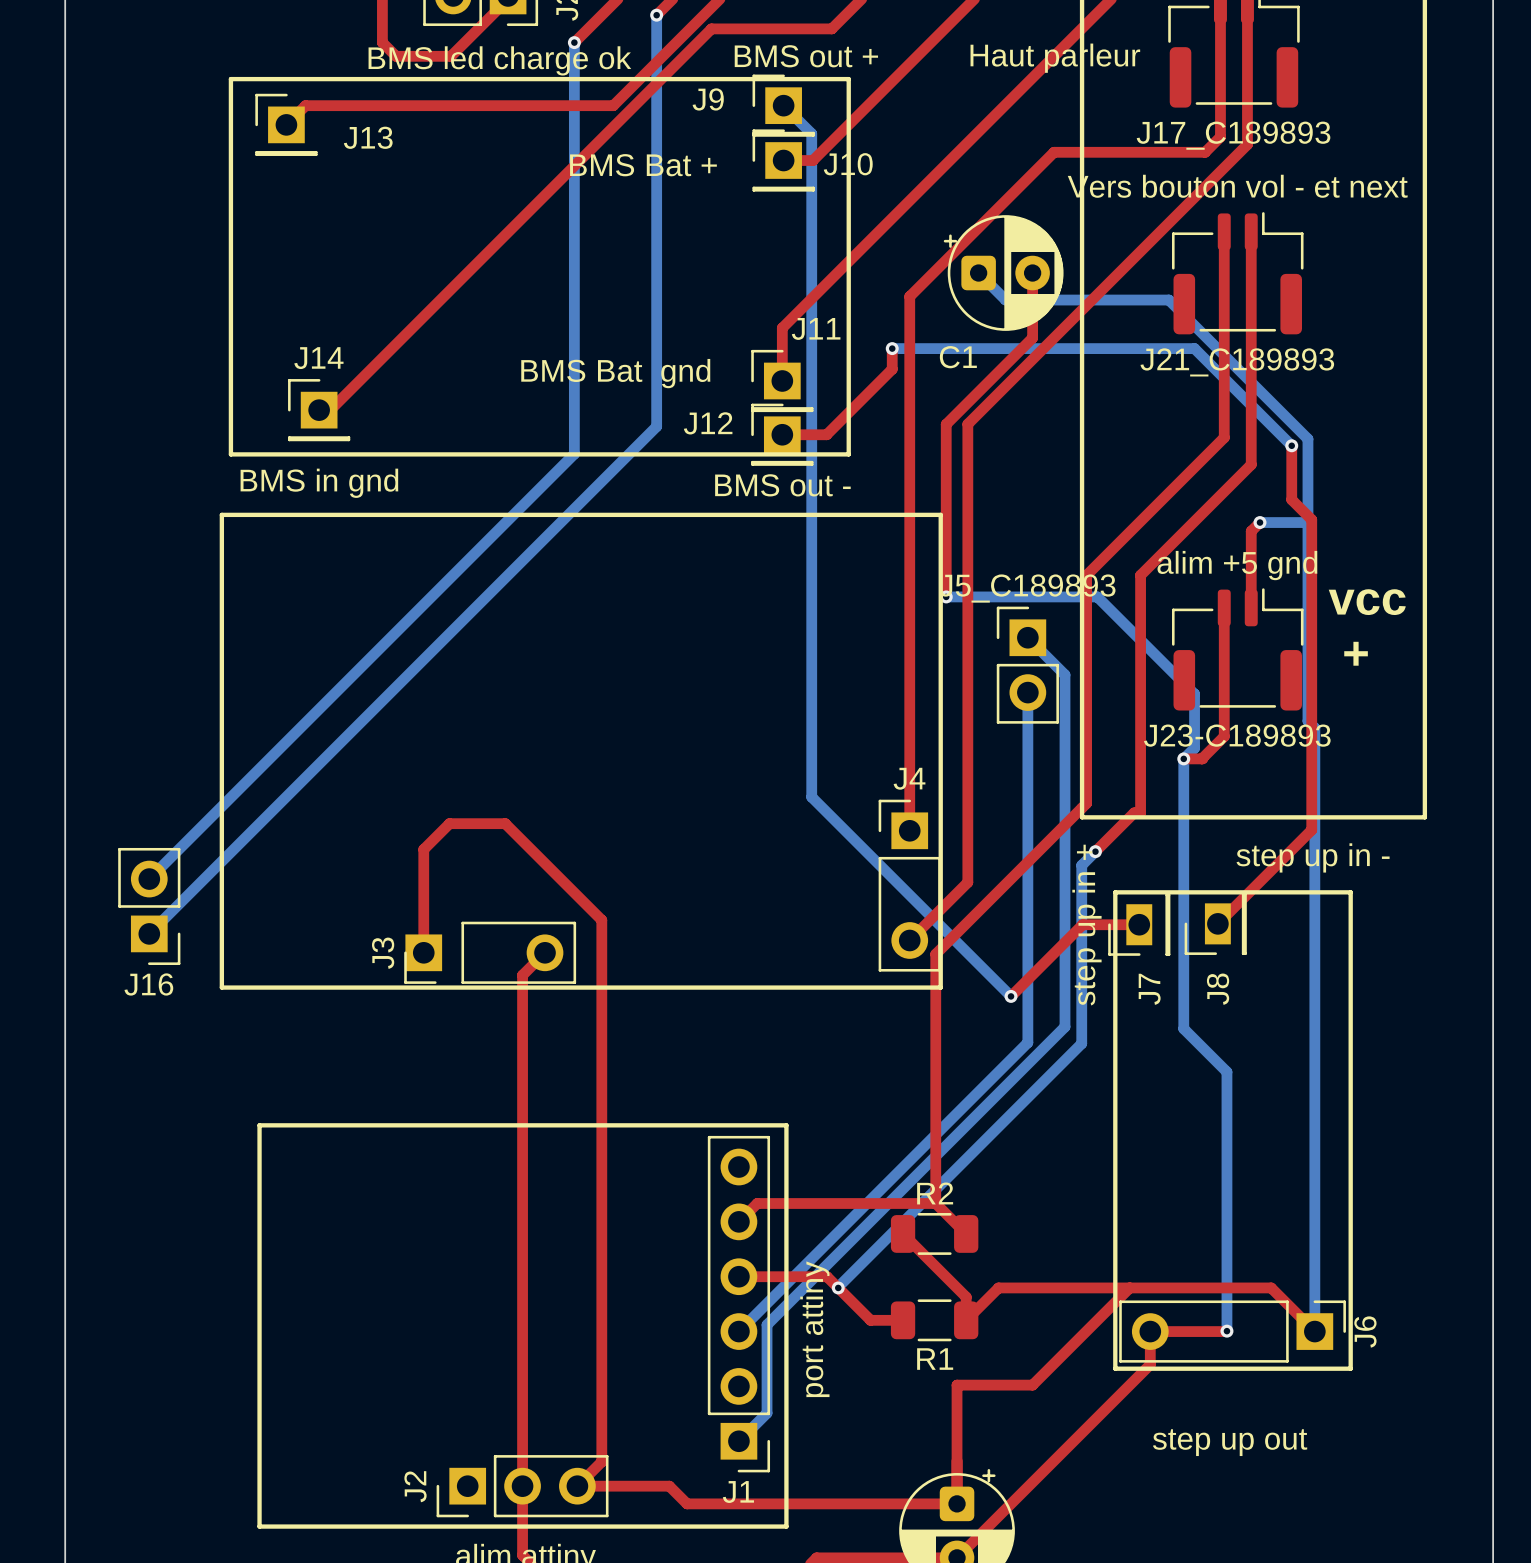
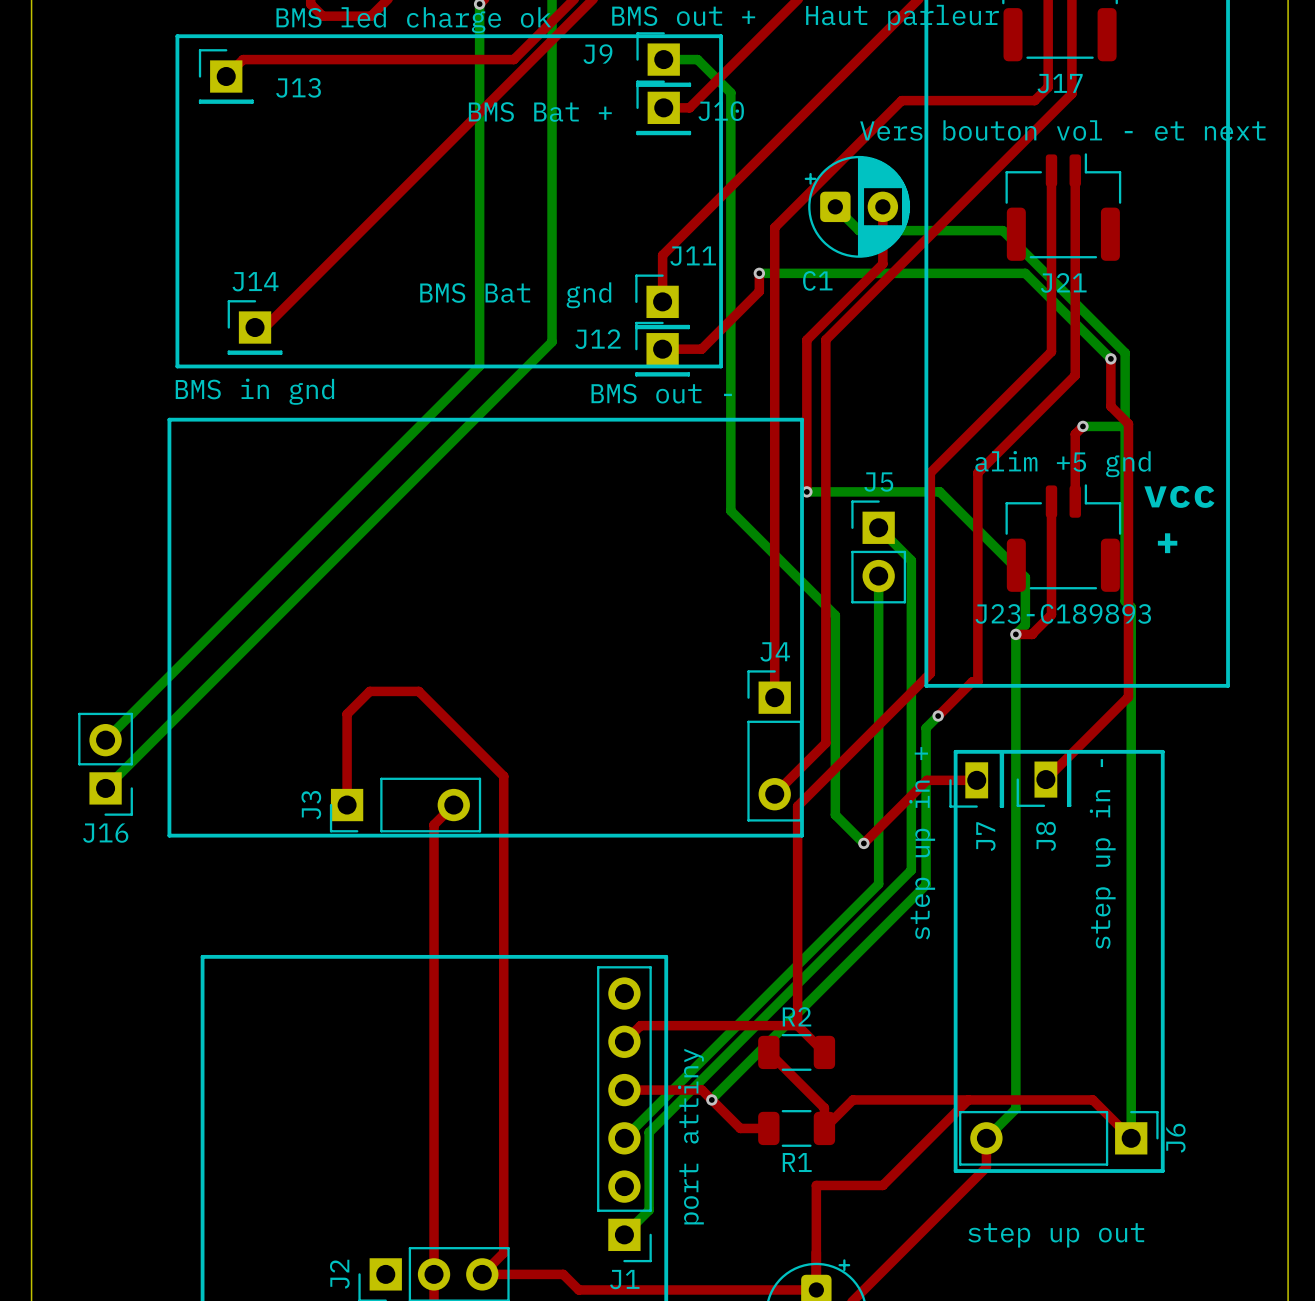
bottom track: (783, 105) (811, 133) (811, 797) (978, 964) -> (663, 59) (697, 59) (730, 92) (730, 510) (835, 615) (835, 814)
J17_C189893 name: J17_C189893 (1233, 135) -> J17 (1060, 83)
J21_C189893 name: J21_C189893 (1237, 362) -> J21 (1063, 282)
J5_C189893 name: J5_C189893 (1027, 588) -> J5 (878, 482)
J8 value rotation: 0° (1313, 857) -> 90° counterclockwise (1102, 854)
J7 value position: step up in + (1086, 925) -> step up in + (922, 843)
bottom track: (1183, 1028) (1226, 1072) (1226, 1331) -> (1015, 871) (1015, 1108) (986, 1138)
top track: (1226, 1331) (1150, 1331) -> none
via: (1226, 1331) -> none

